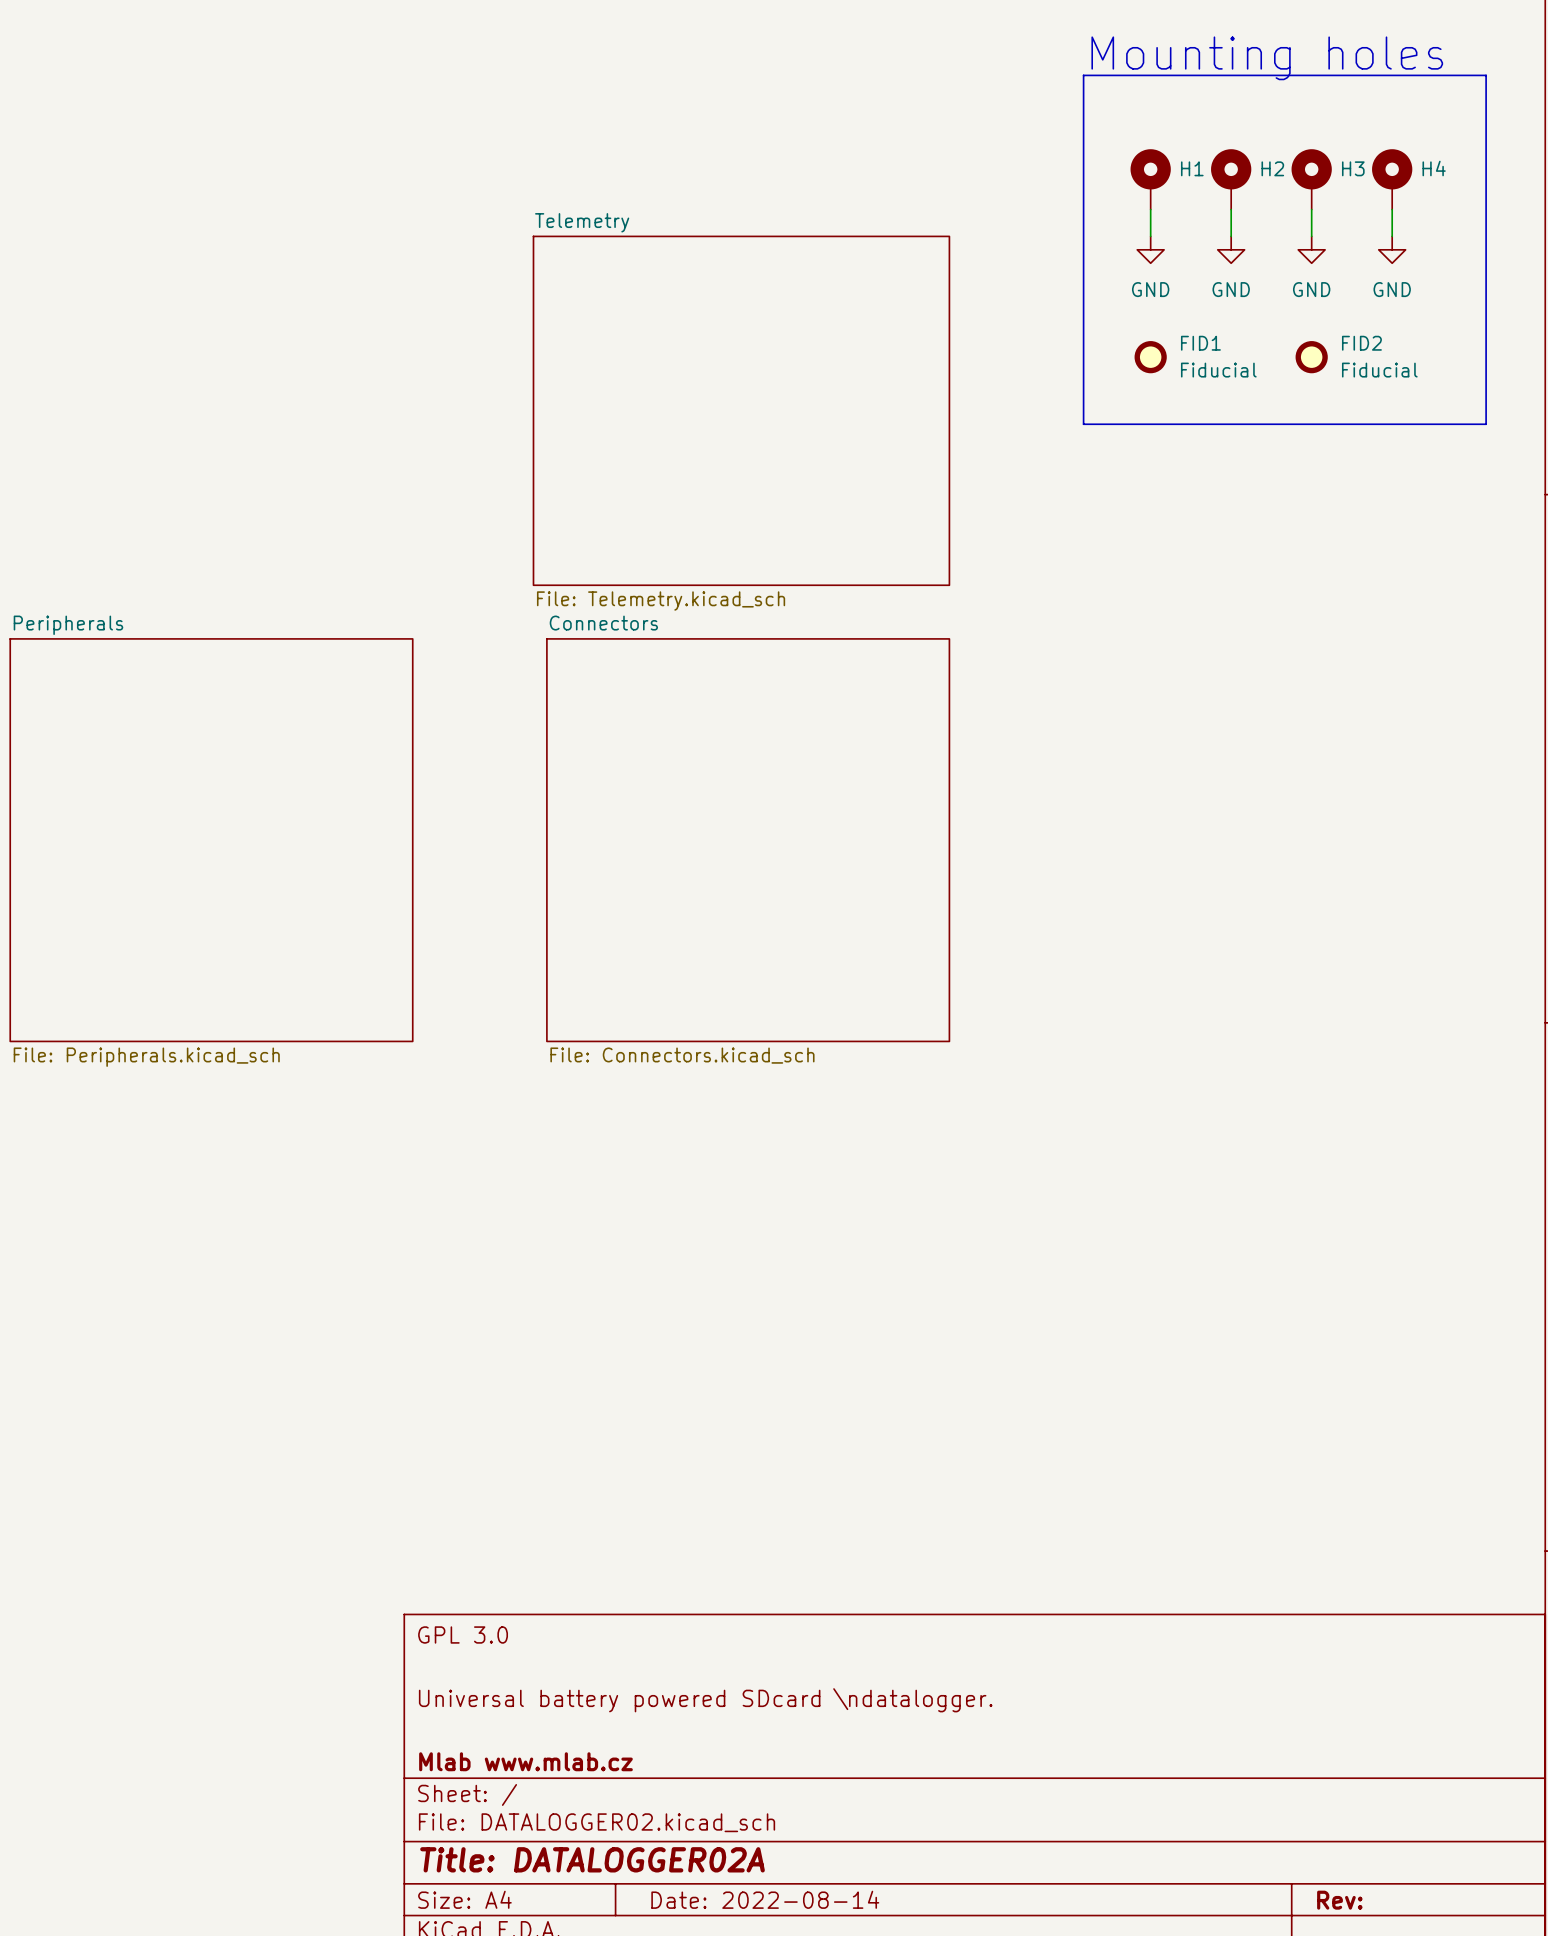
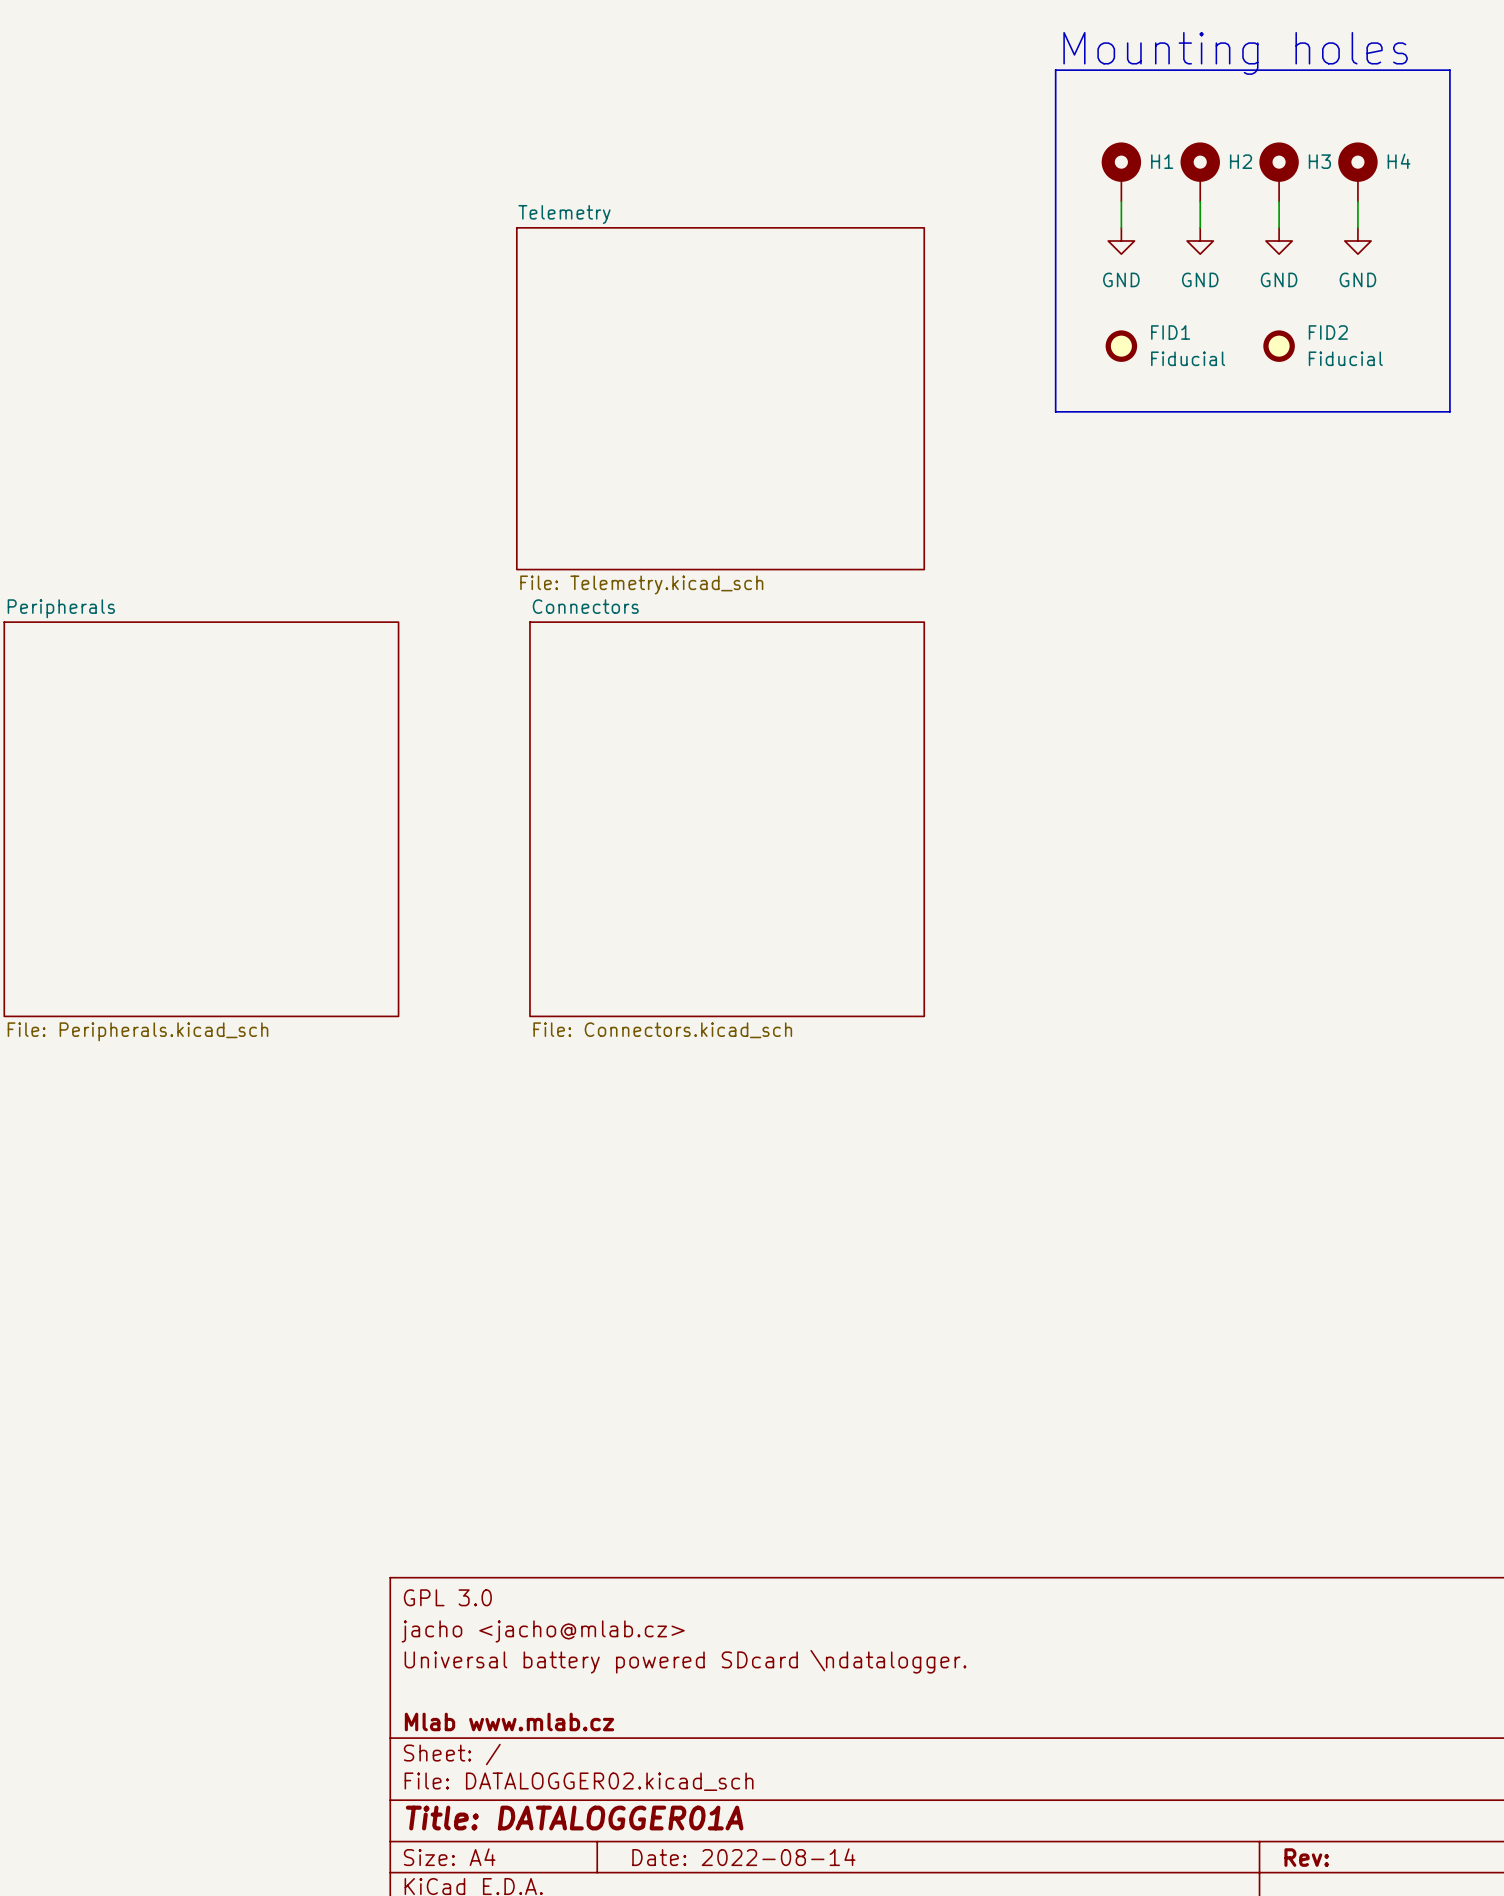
title block: none -> jacho <jacho@mlab.cz> (543, 1631)
title block: Title: DATALOGGER02A (592, 1859) -> Title: DATALOGGER01A (574, 1818)

